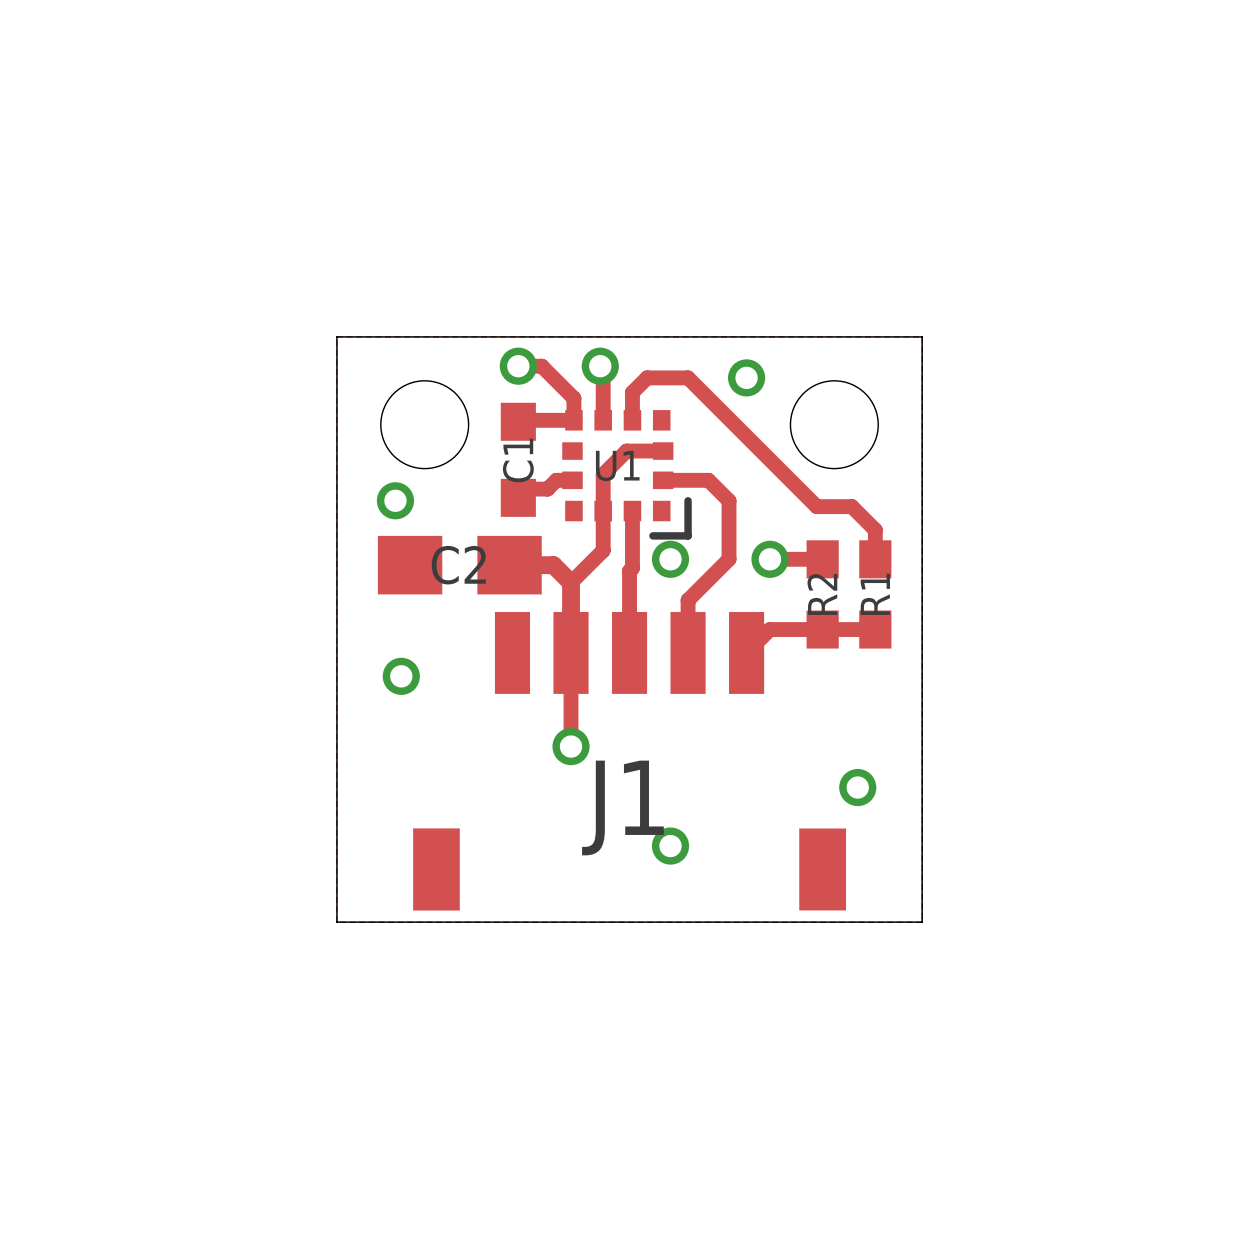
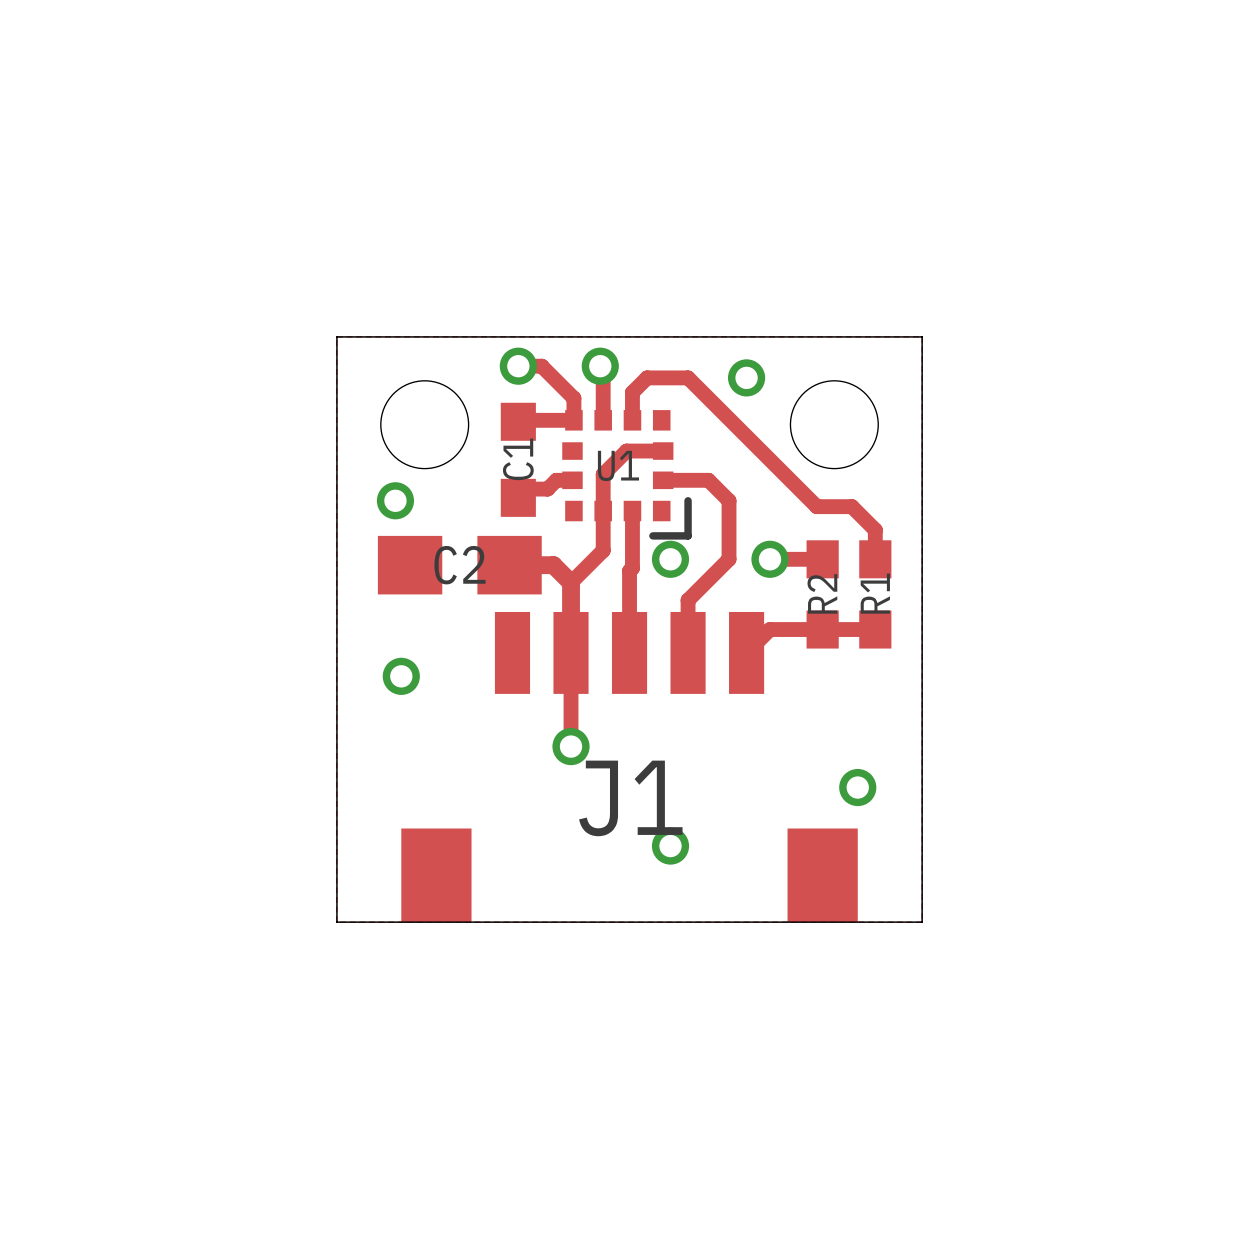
J1 footprint: [413, 611, 847, 911] -> [401, 611, 858, 923]

